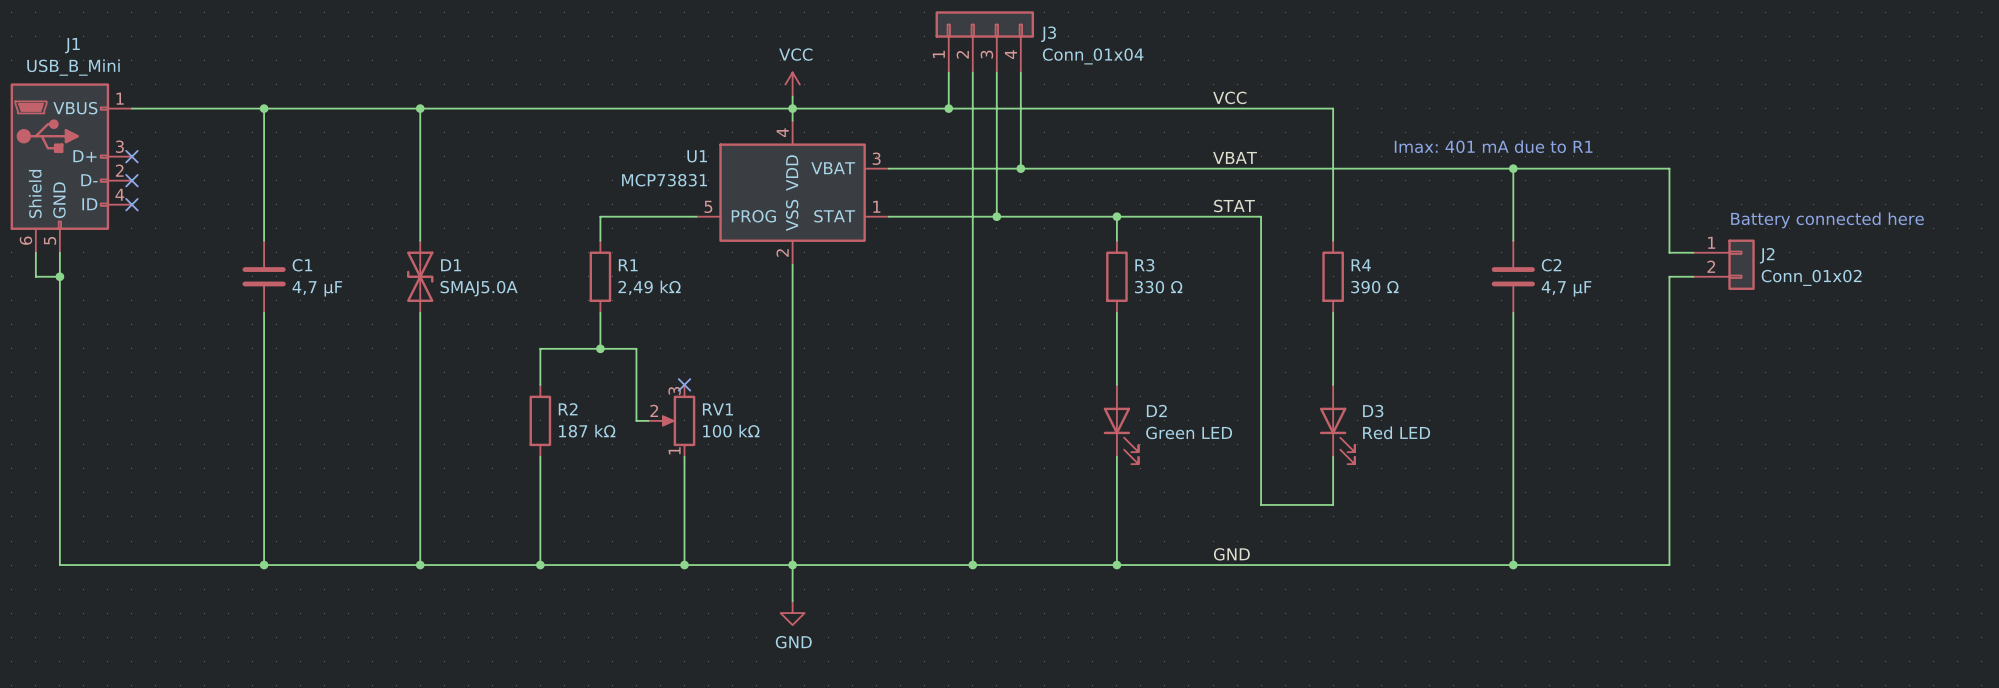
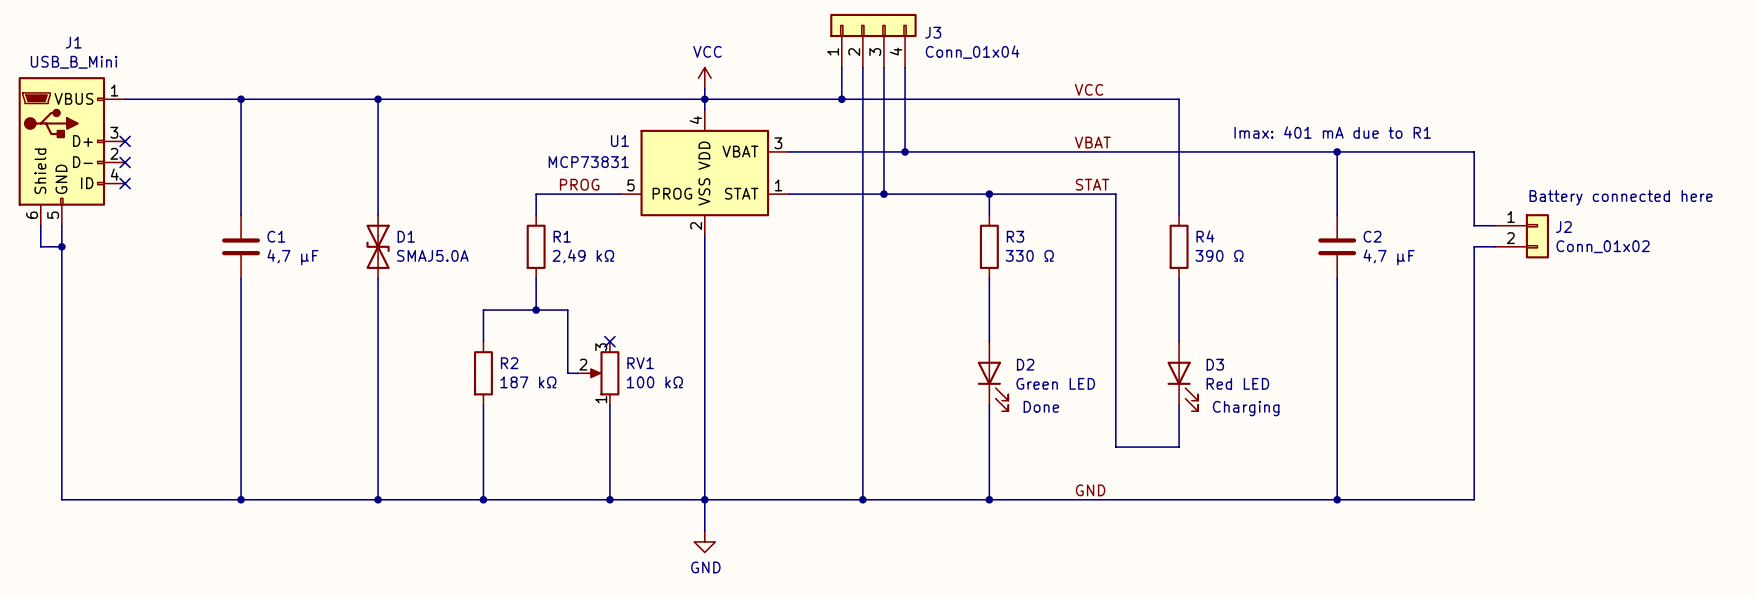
label: none -> PROG (579, 184)
text: none -> Done (1041, 406)
text: none -> Charging (1246, 408)

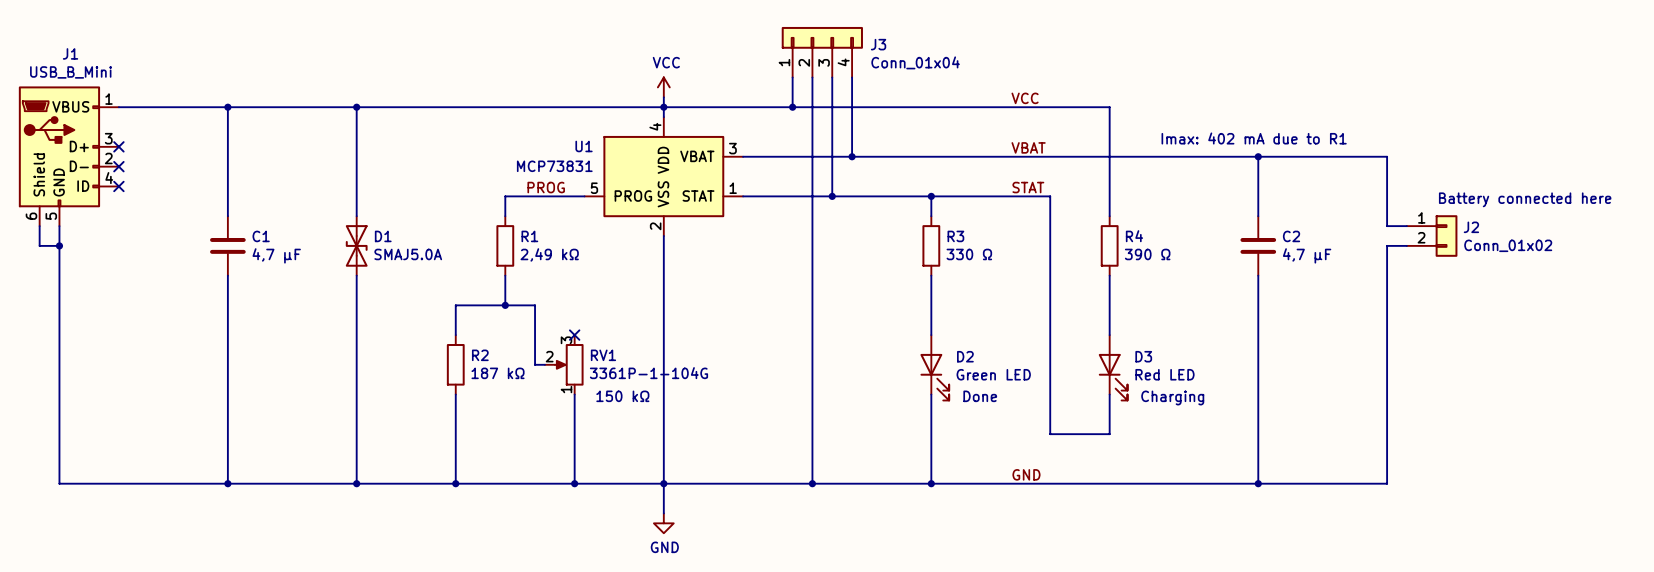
text: Imax: 401 mA due to R1 (1332, 132) -> Imax: 402 mA due to R1 (1254, 138)
RV1 value: 100 kΩ (654, 382) -> 3361P-1-104G (648, 373)
text: none -> 150 kΩ (622, 396)

